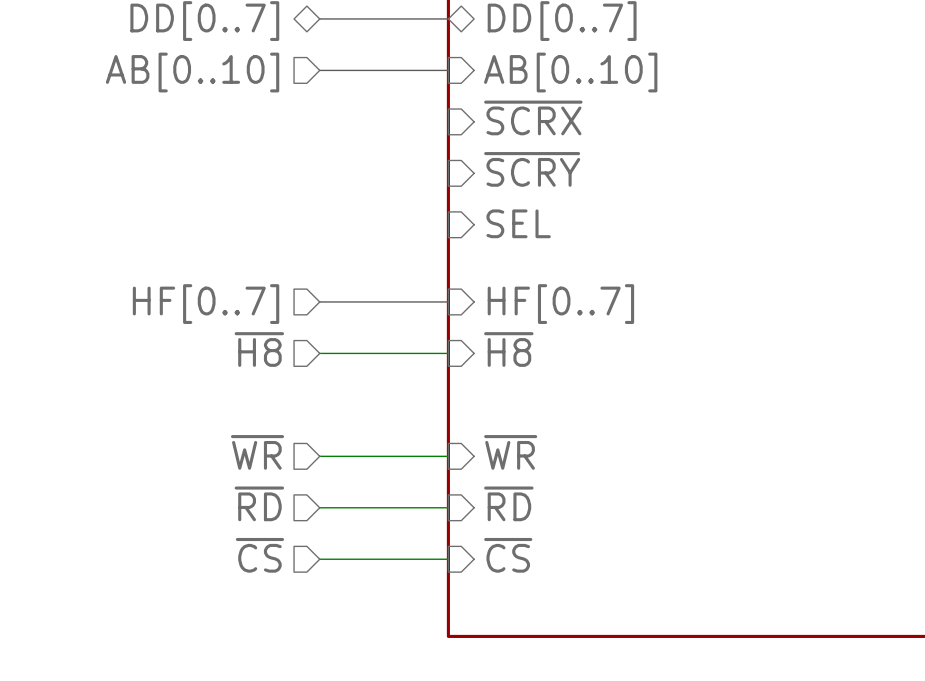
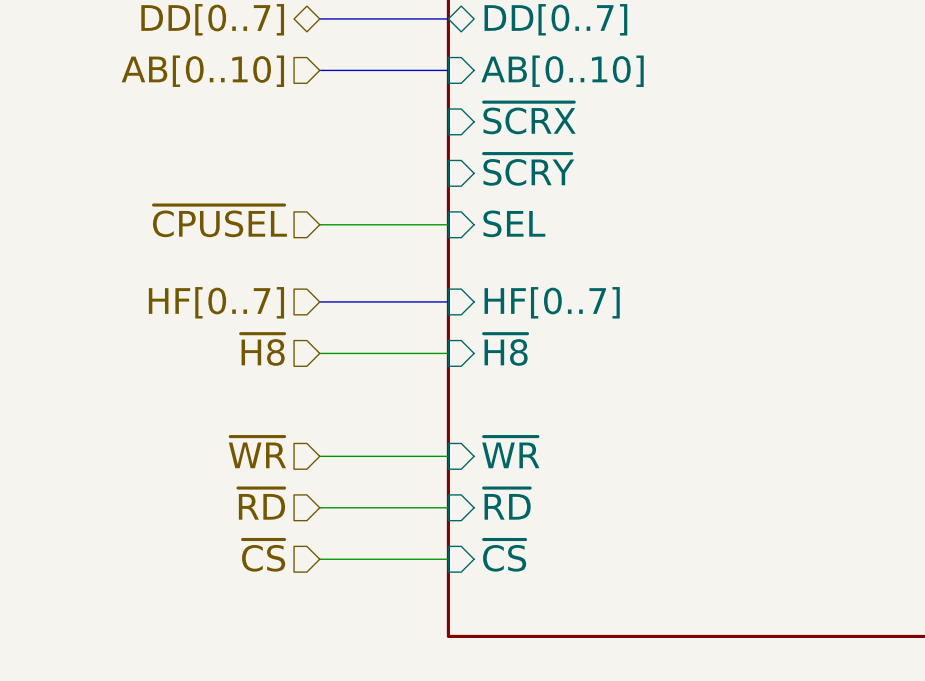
hierarchical label: none -> ~{CPUSEL} (219, 221)
wire: none -> (319, 224) (448, 224)

